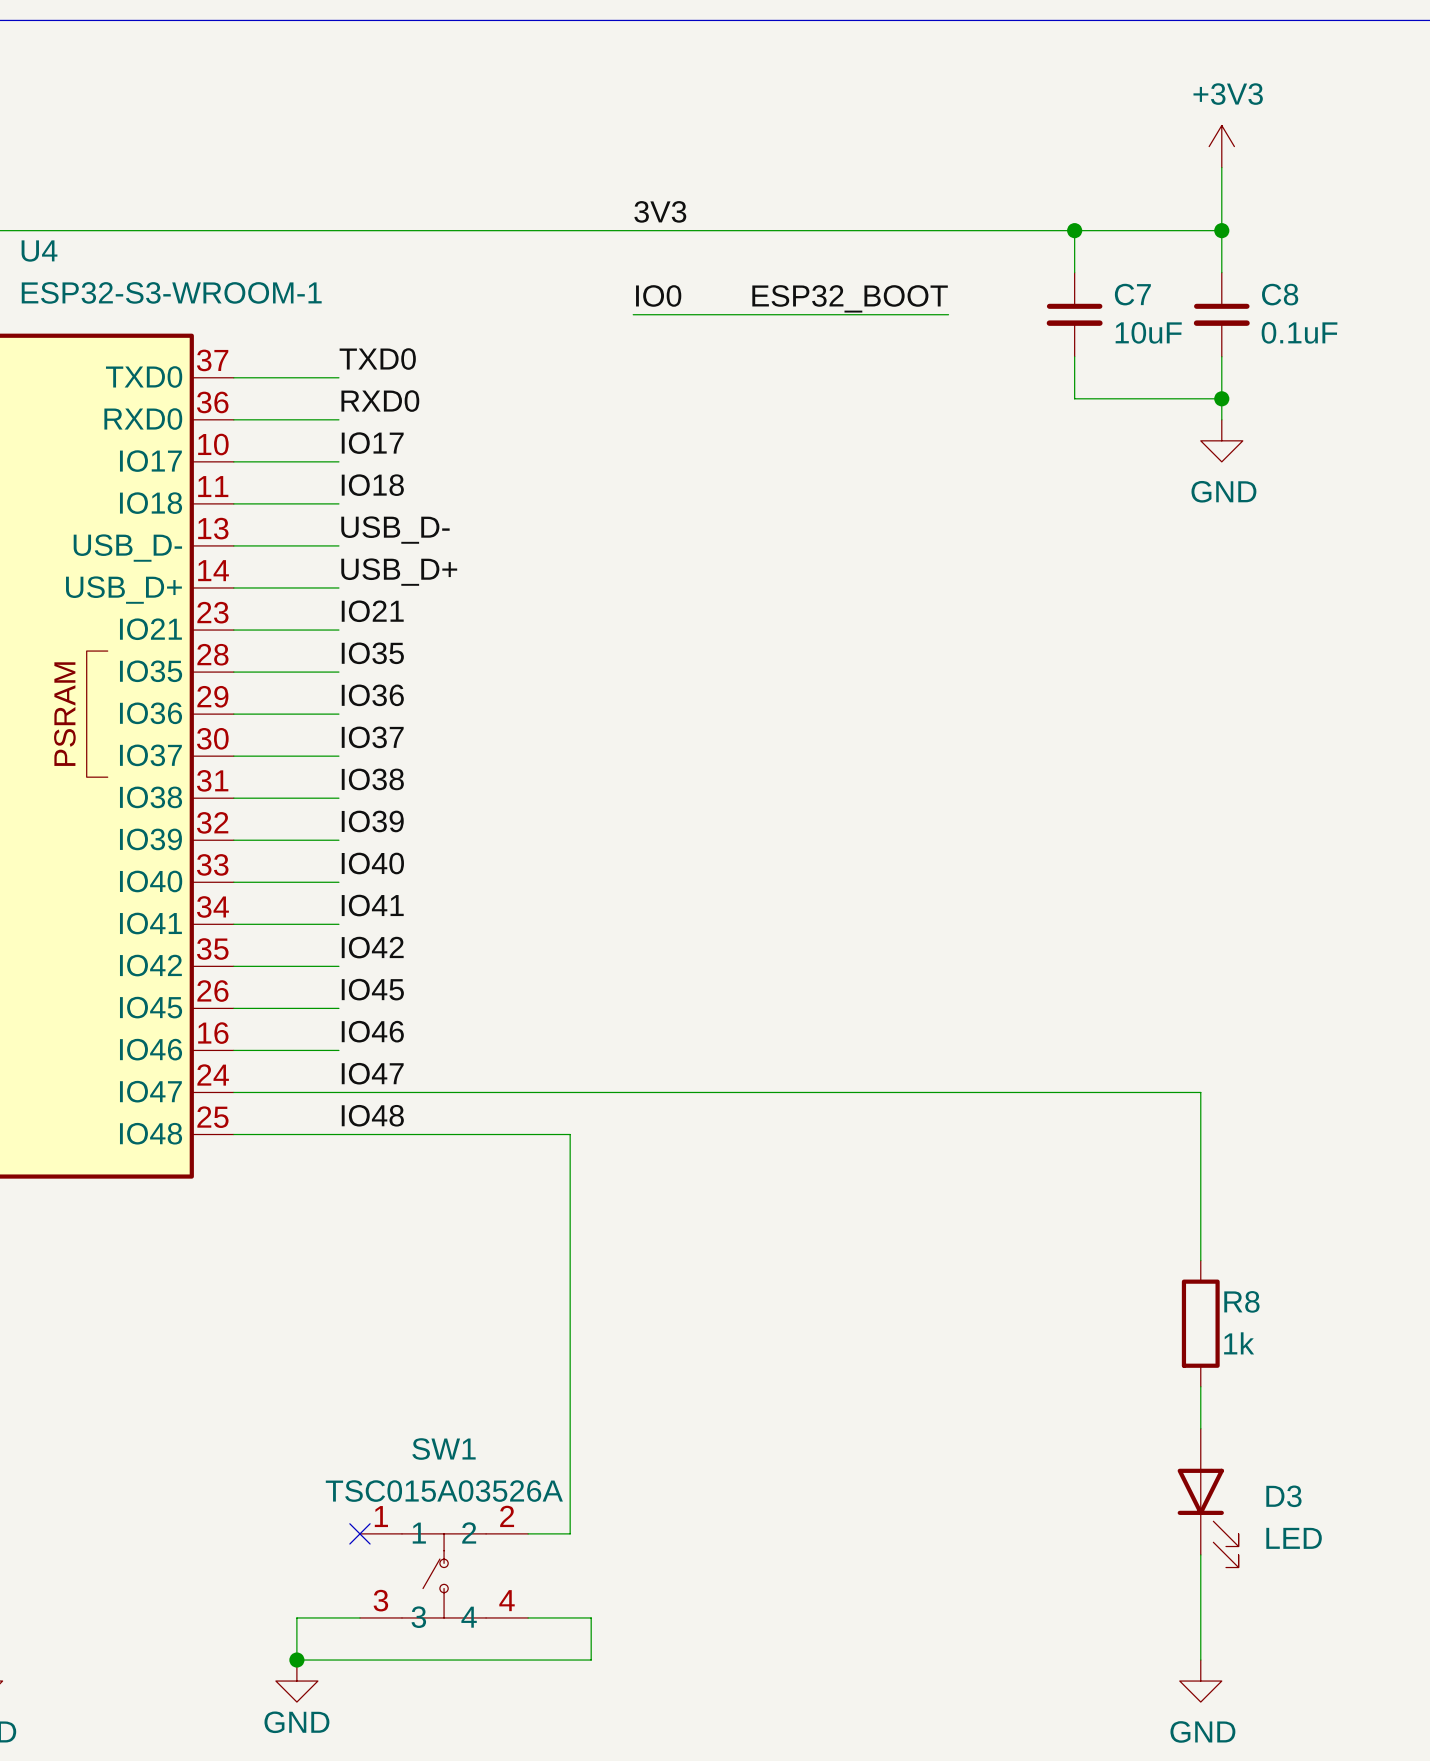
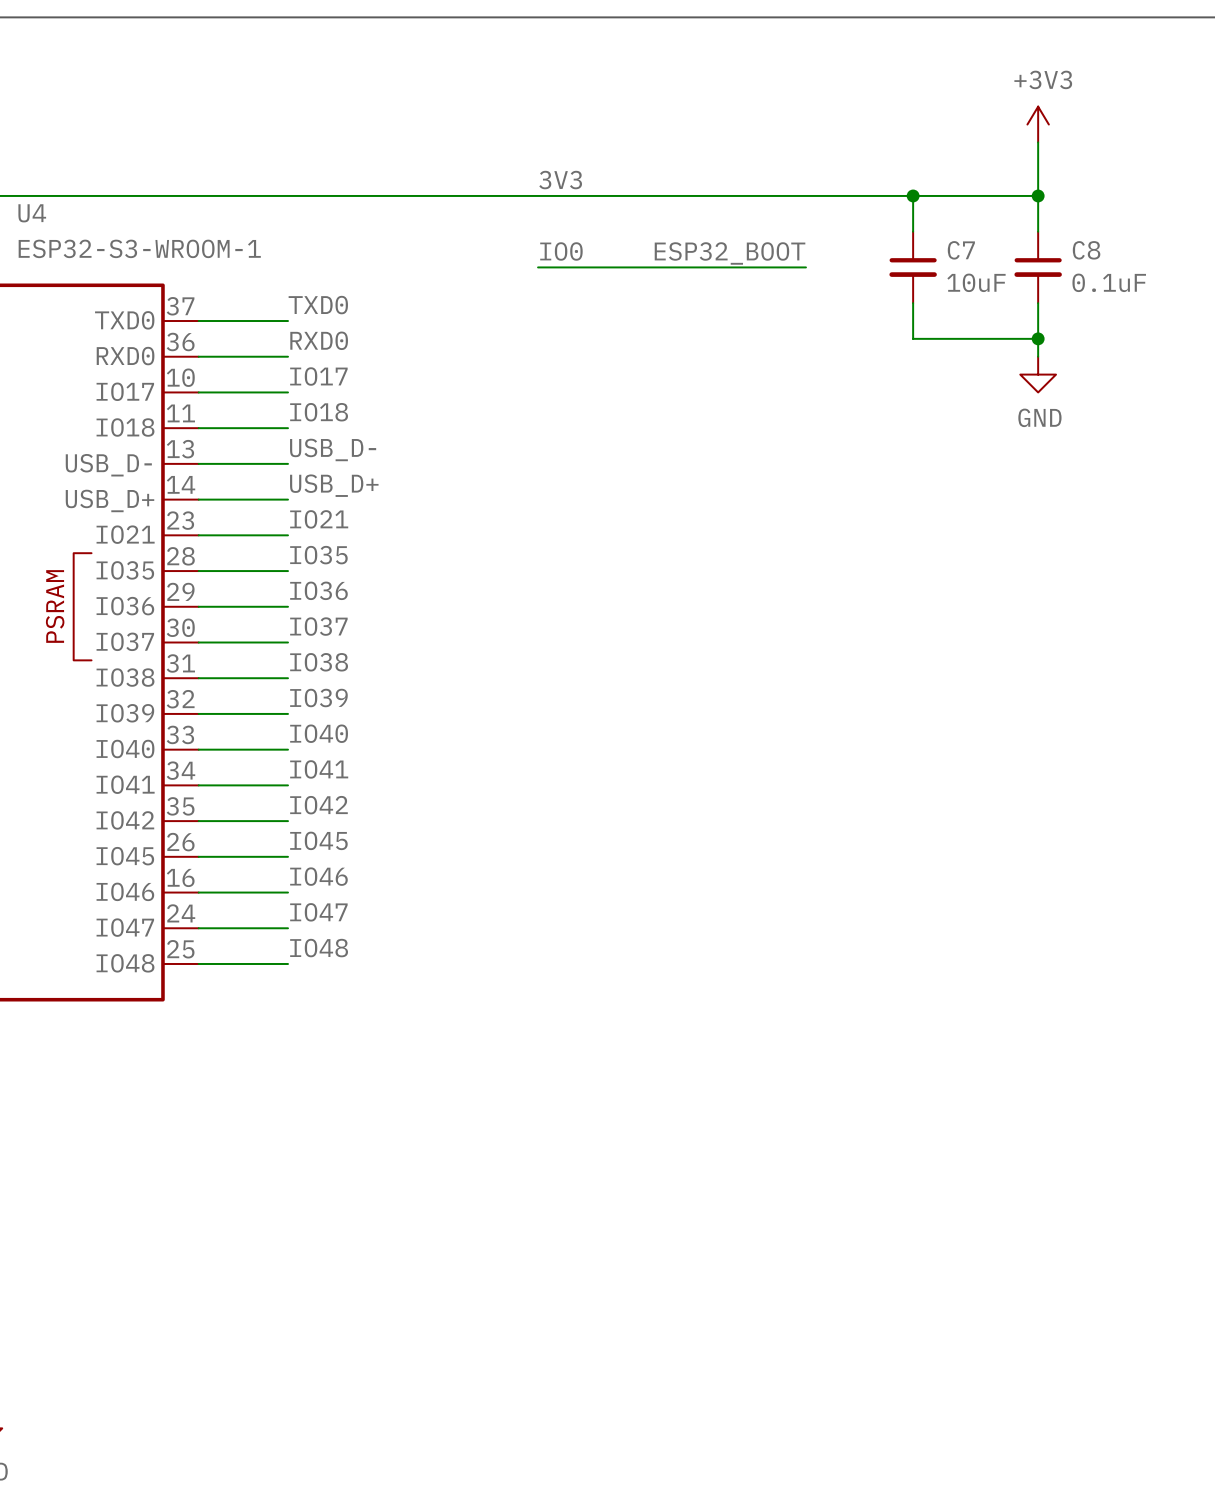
wire: (338, 1092) (1200, 1092) (1200, 1260) -> none
wire: (338, 1134) (570, 1134) (570, 1533) (528, 1533) -> none
R8: 1k (1200, 1323) -> none
wire: (1200, 1386) (1200, 1428) -> none
D3: LED (1208, 1498) -> none
no-connect mark: (359, 1533) -> none
wire: (1200, 1554) (1200, 1660) -> none
SW1: TSC015A03526A (444, 1575) -> none
wire: (359, 1617) (296, 1617) (296, 1660) (591, 1660) (591, 1617) (528, 1617) -> none
junction: (296, 1660) -> none
power symbol: GND (296, 1681) -> none
power symbol: GND (1200, 1681) -> none

